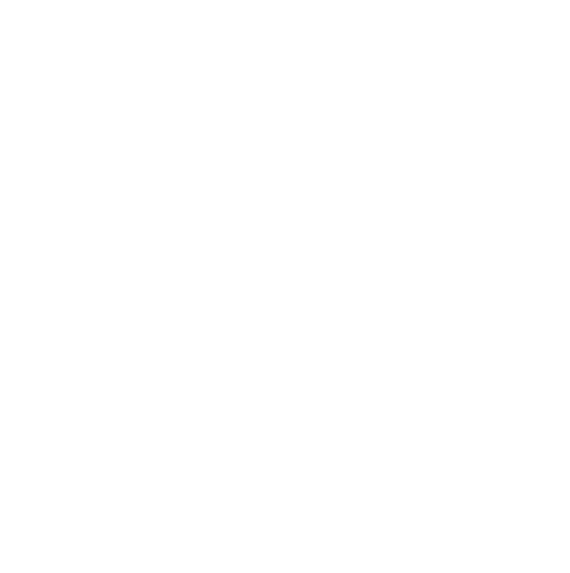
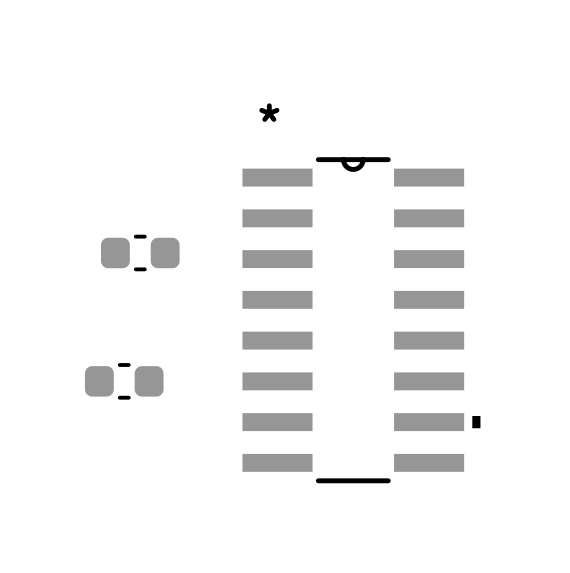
part: none -> (140, 252)
part: none -> (361, 320)
part: none -> (124, 381)

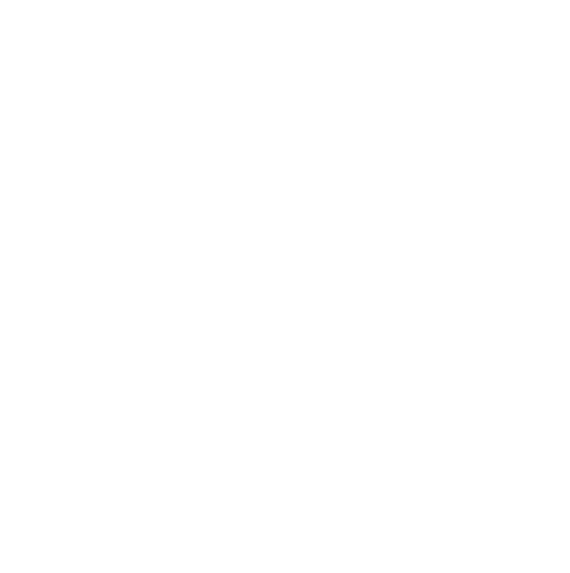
part: (140, 252) -> none
part: (361, 320) -> none
part: (124, 381) -> none

